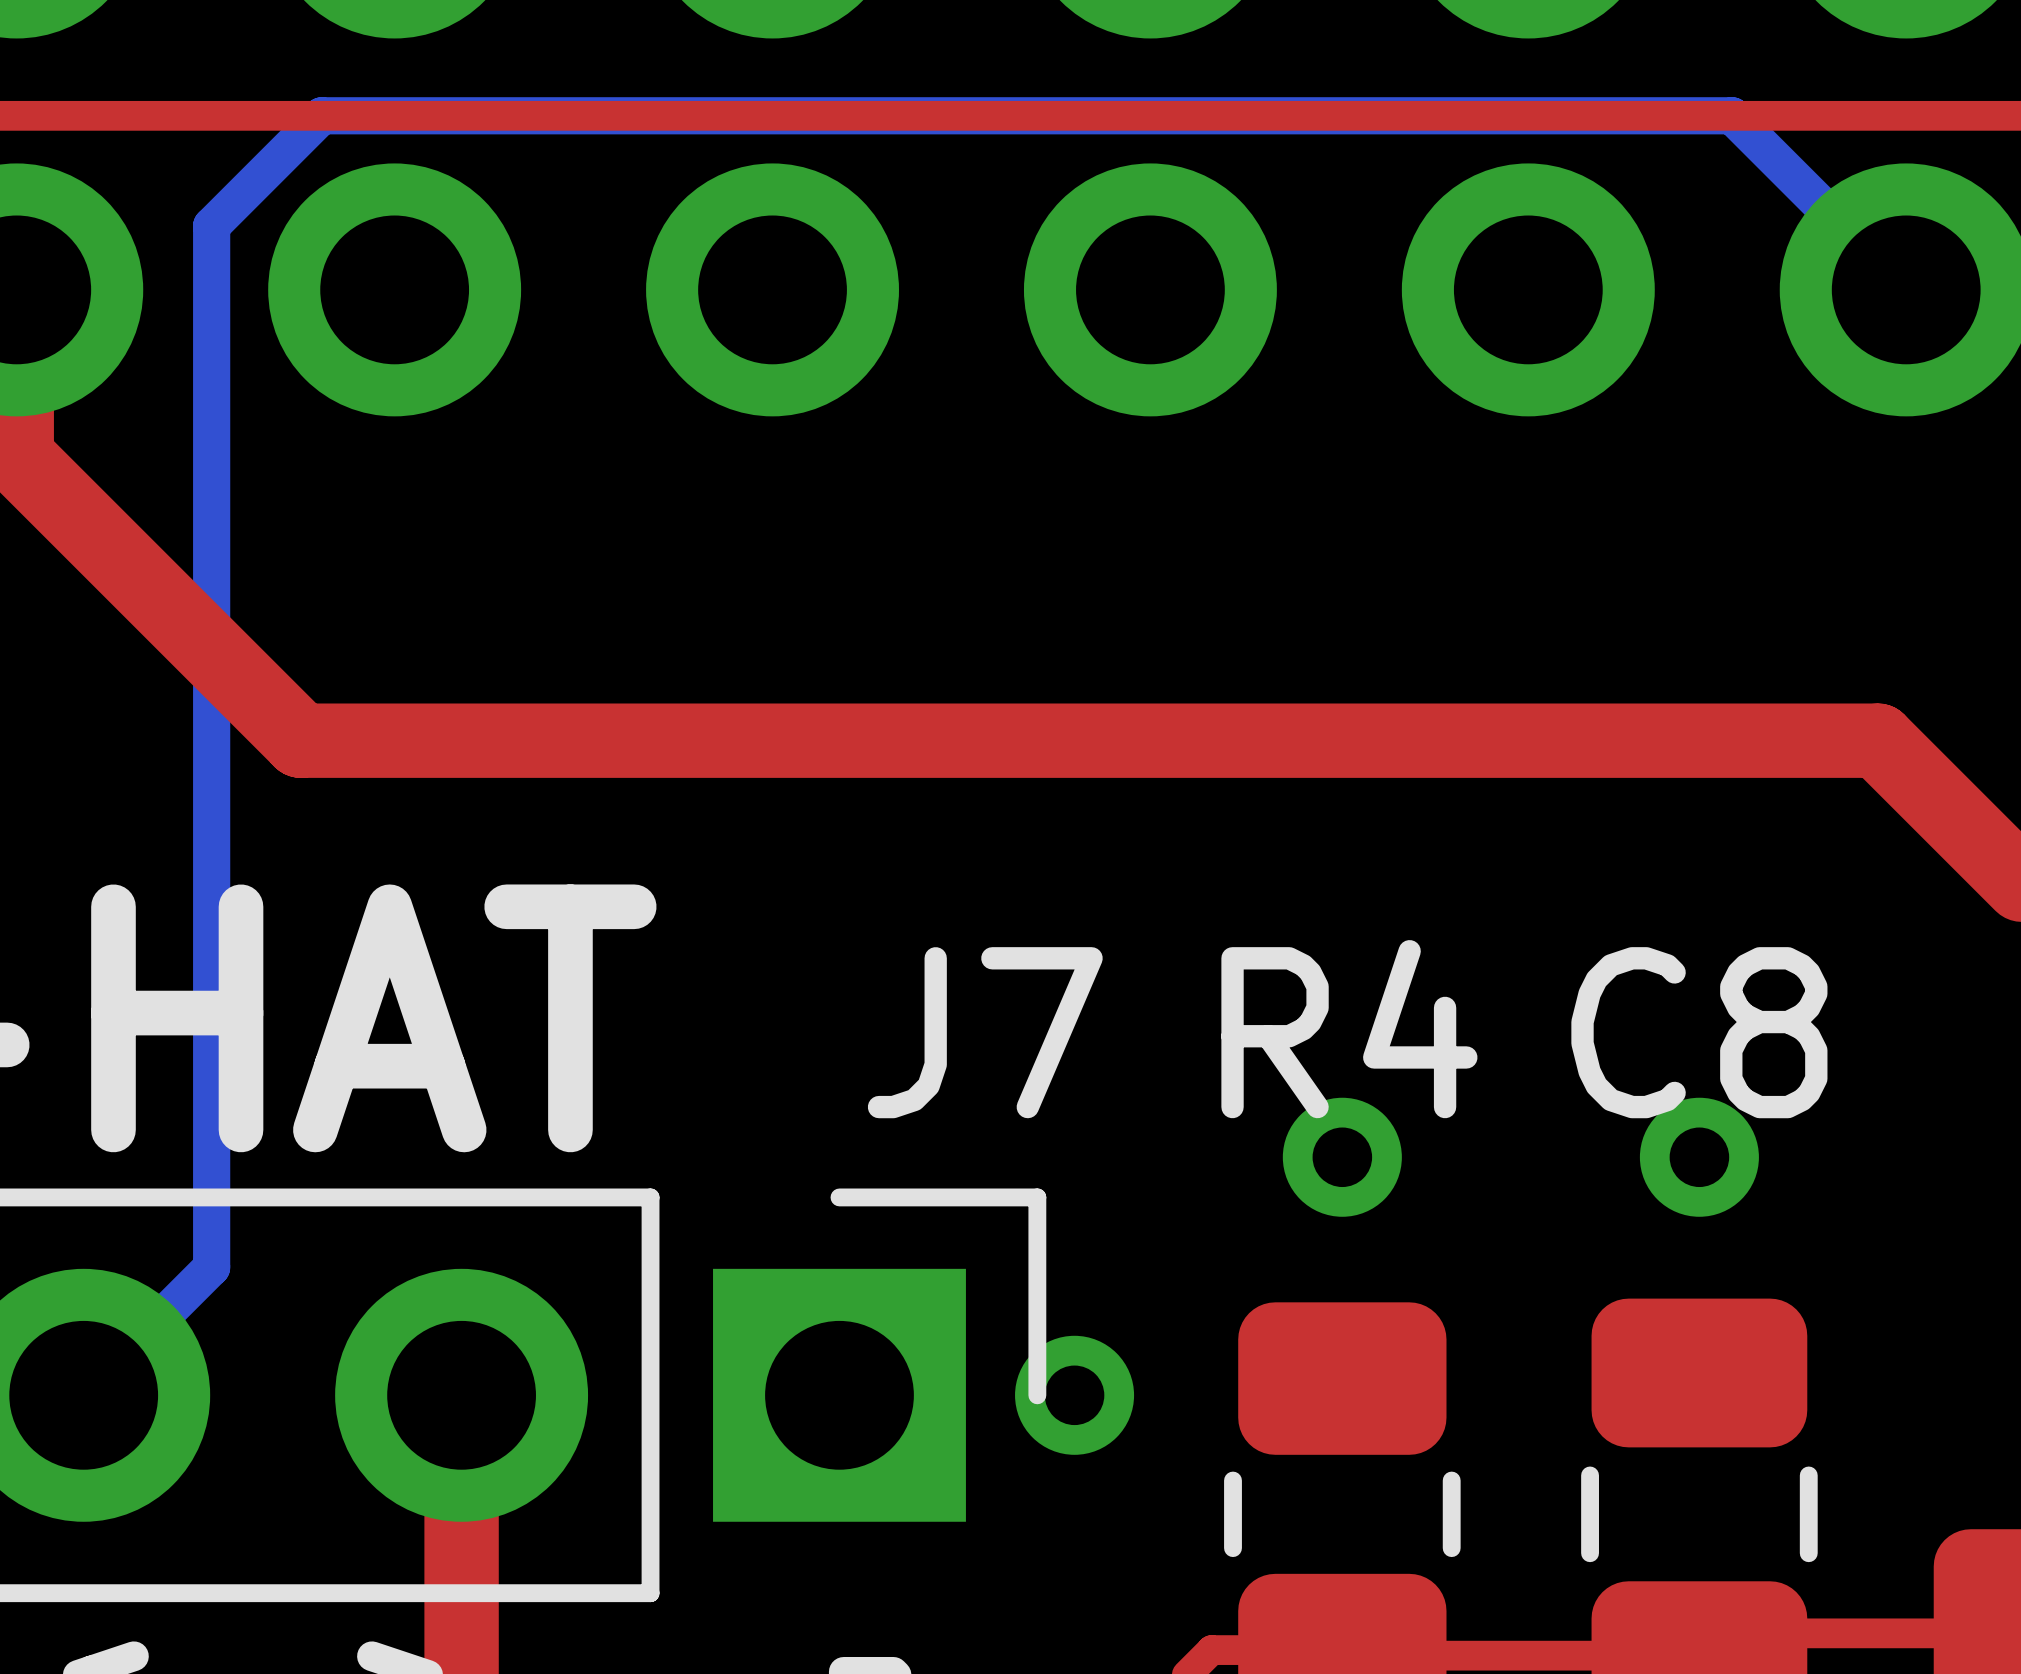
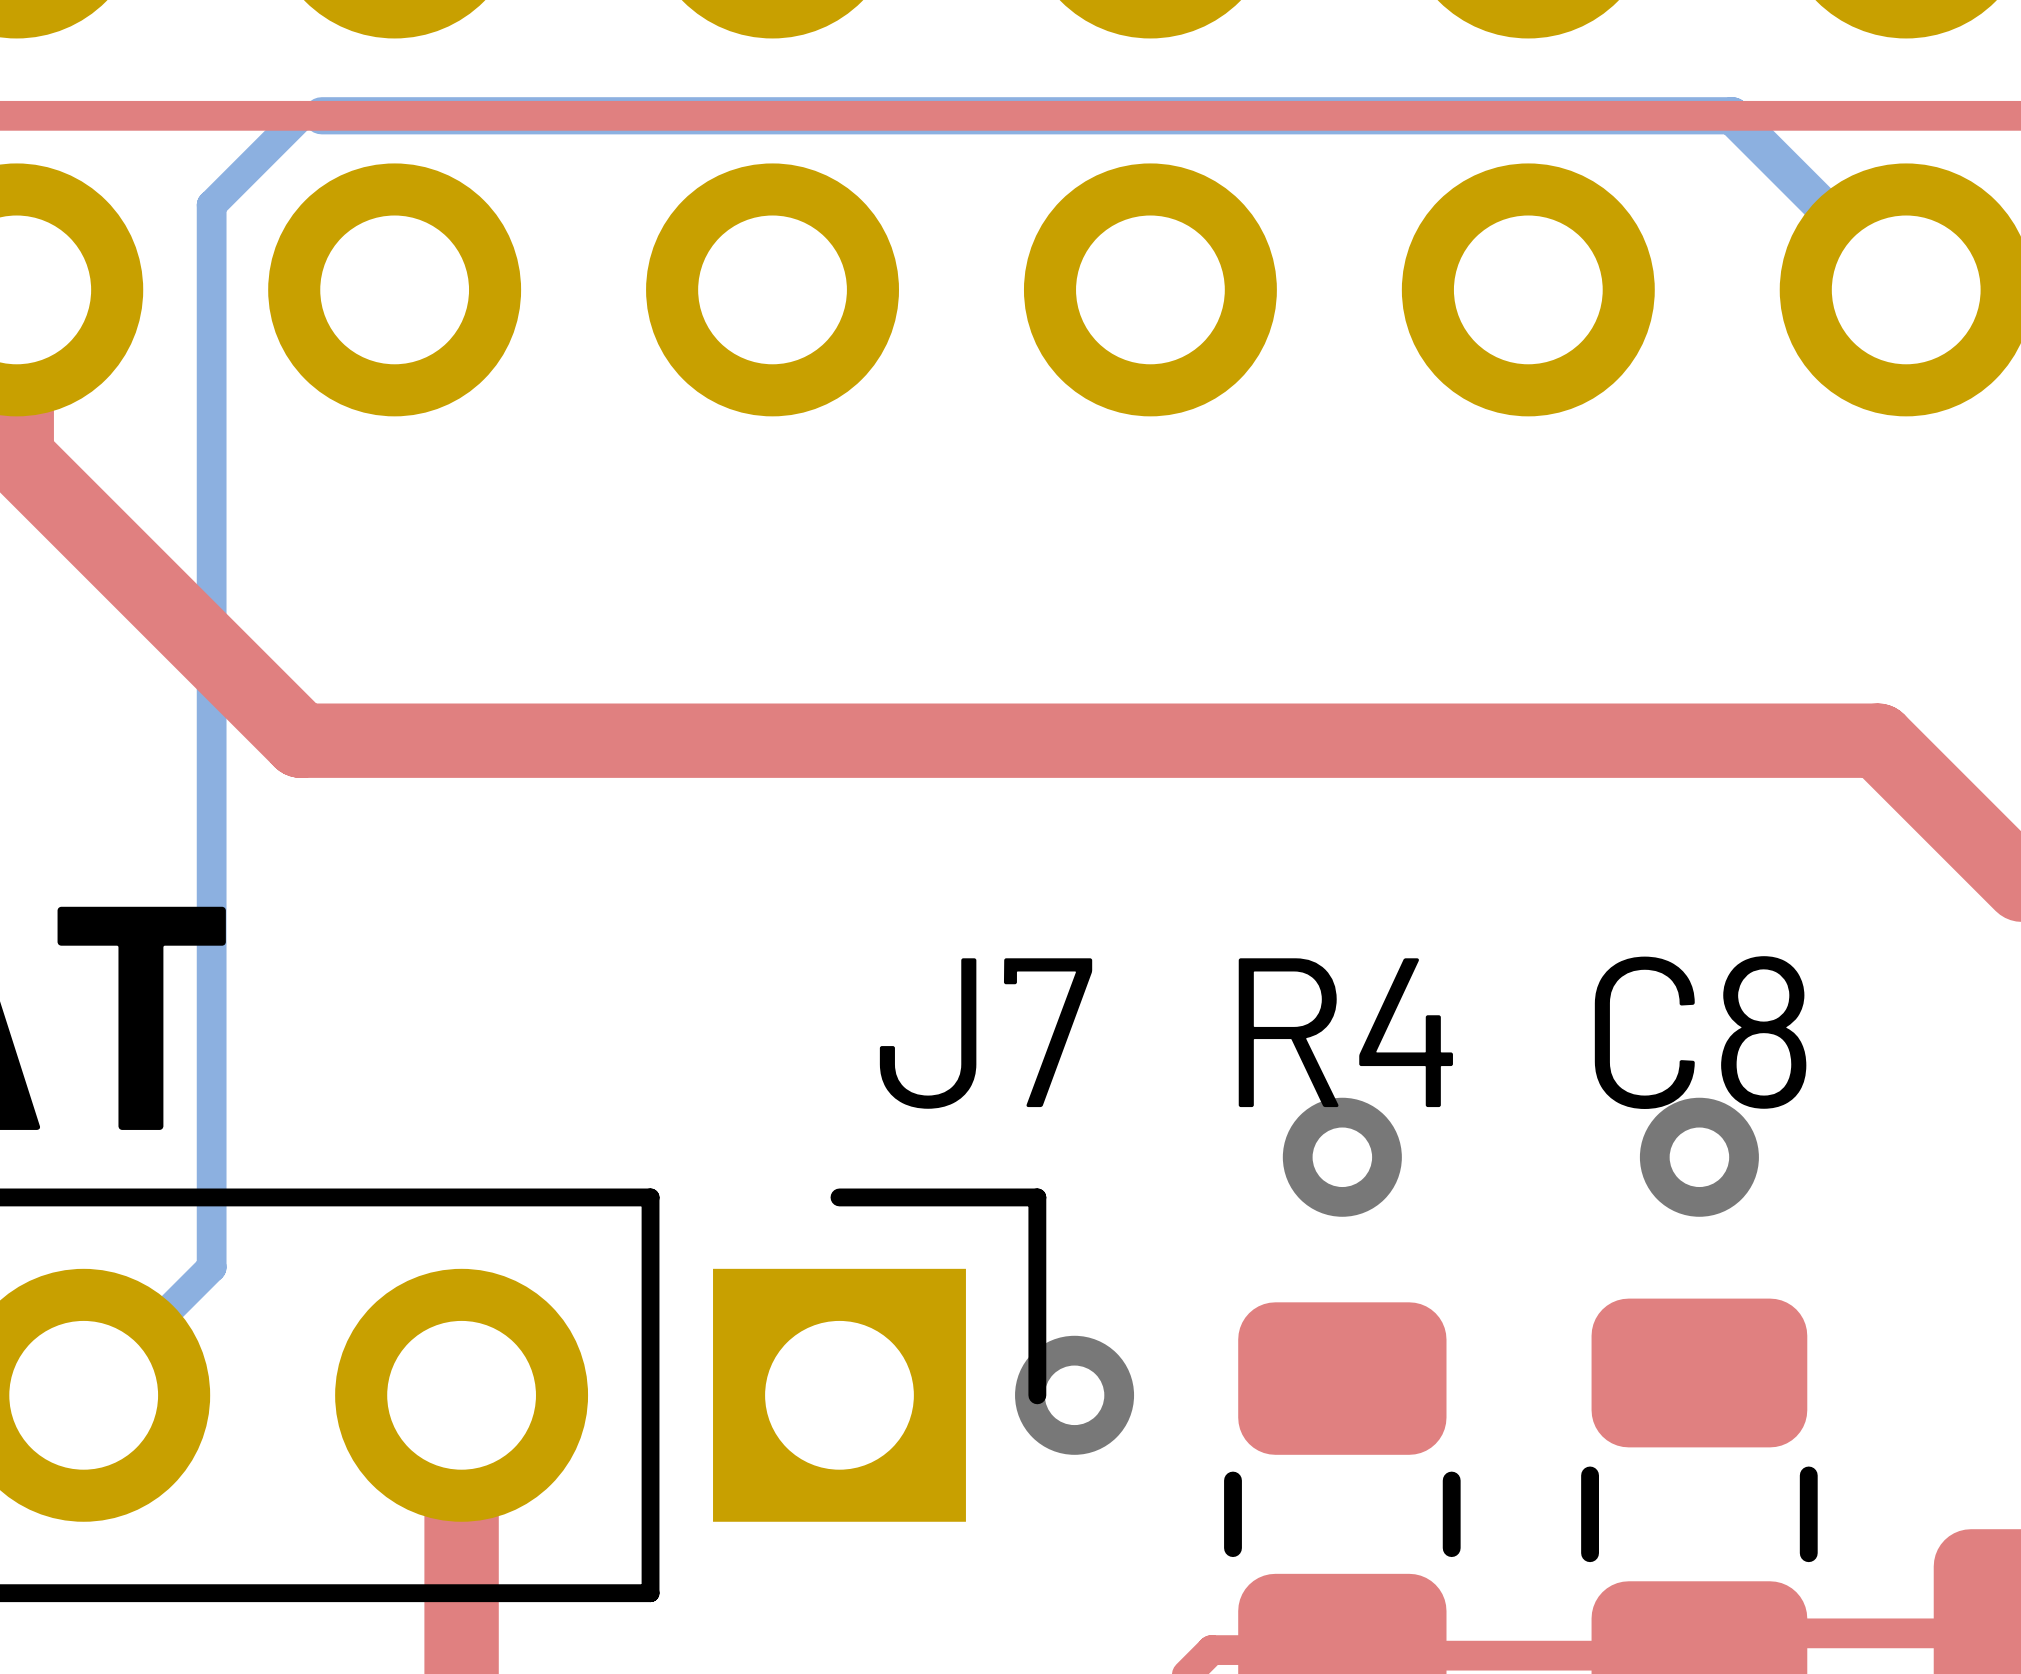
bottom track: (321, 115) (211, 225) -> (300, 115) (211, 205) (211, 225)
bottom track width: thick (211, 225) (211, 1267) (83, 1395) -> thin (211, 225) (211, 1267) (83, 1395)

